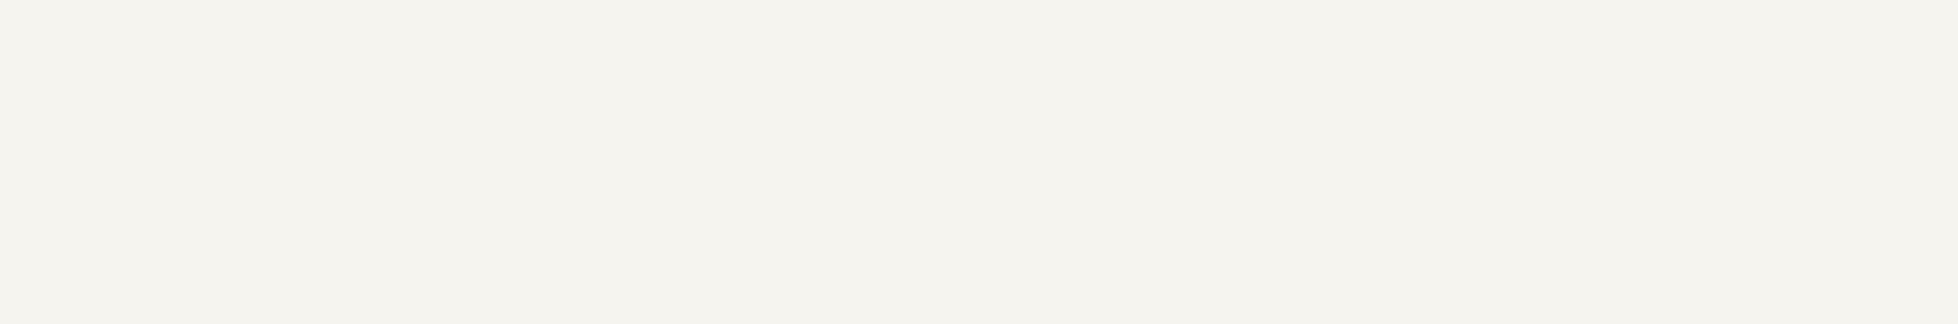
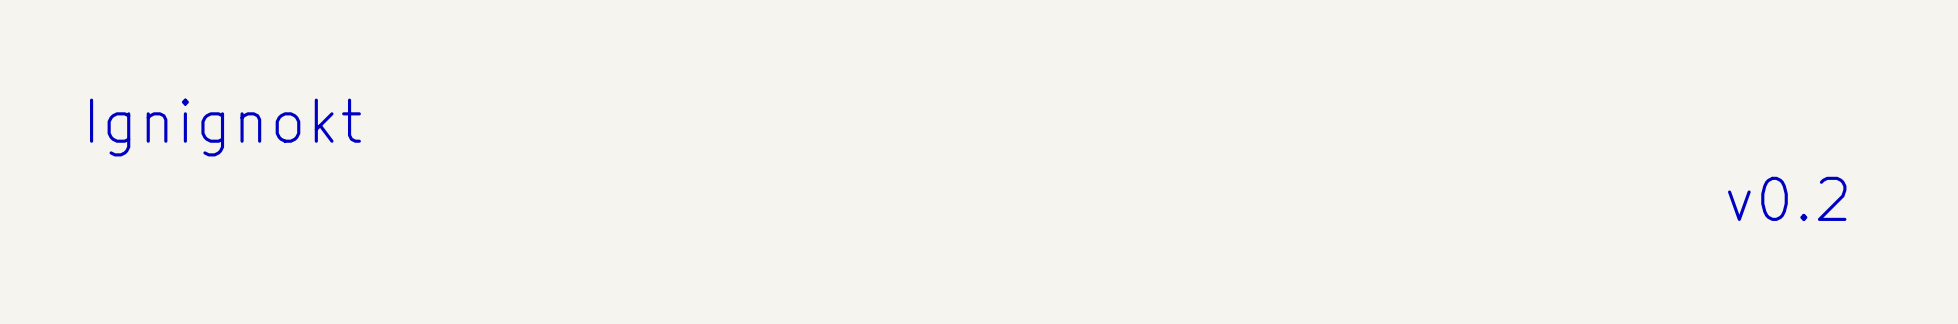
text: none -> Ignignokt (225, 127)
text: none -> v0.2 (1787, 198)

